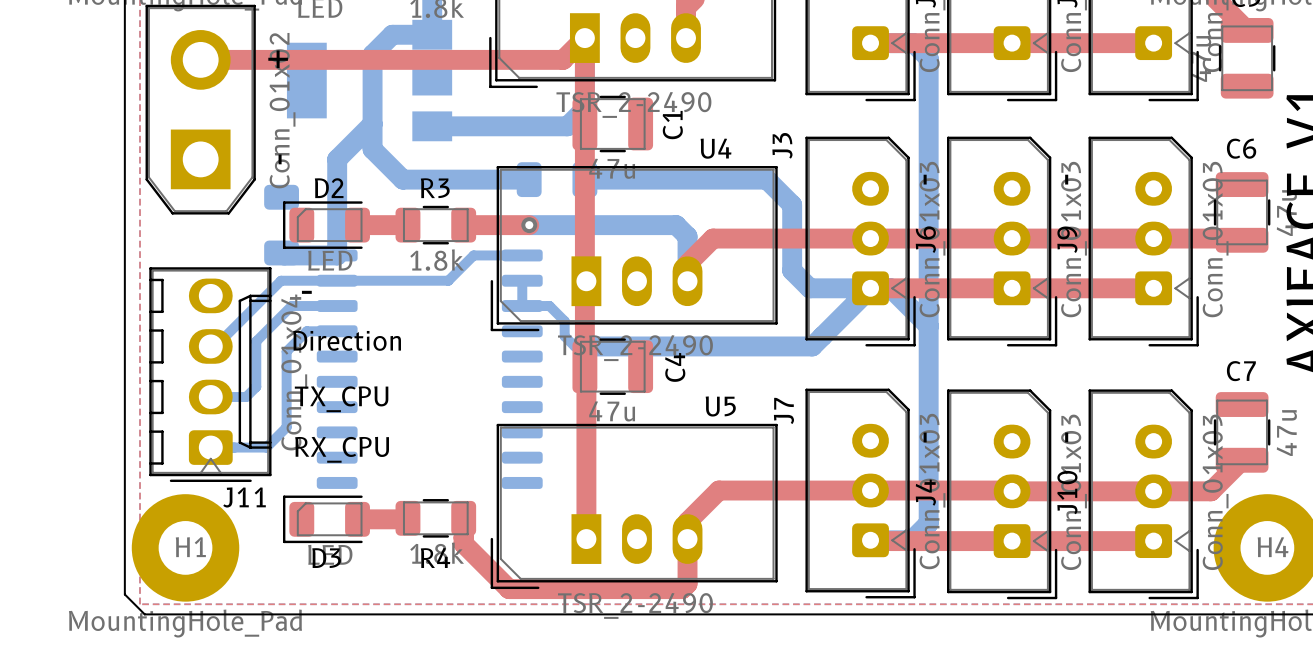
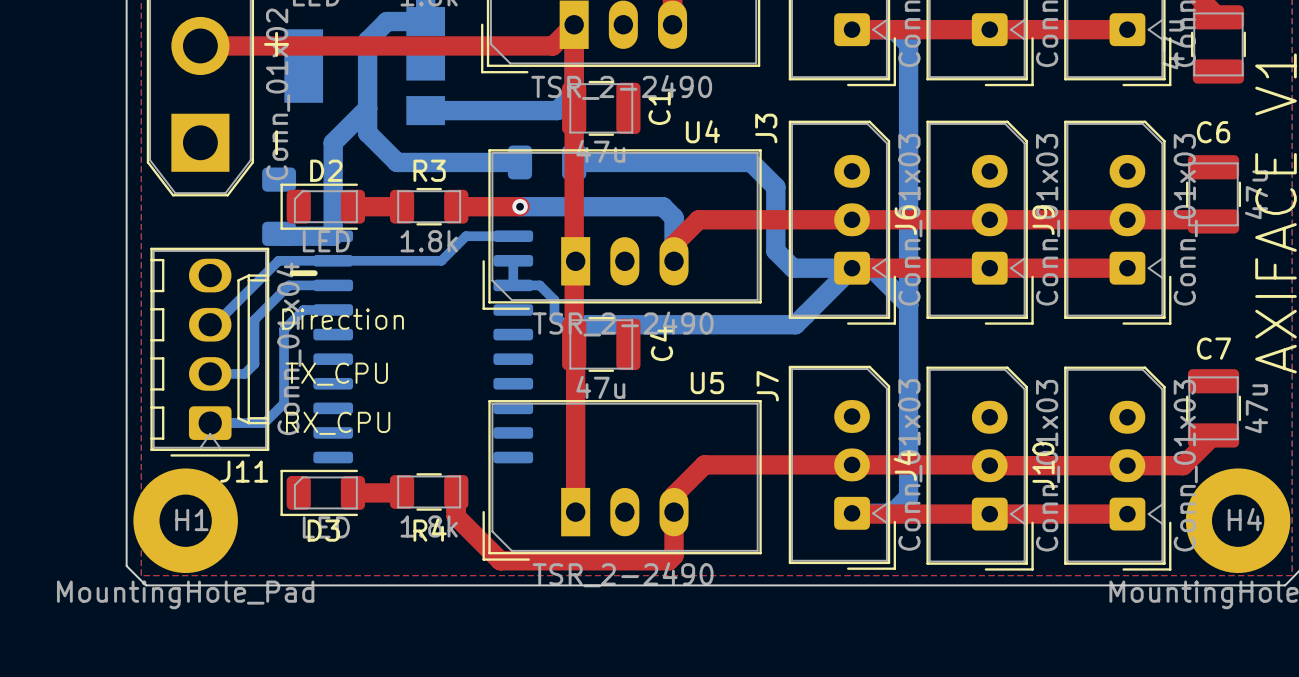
text: - (925, 179) -> none
text: - (1066, 179) -> none
text: - (925, 437) -> none
text: - (1066, 437) -> none

